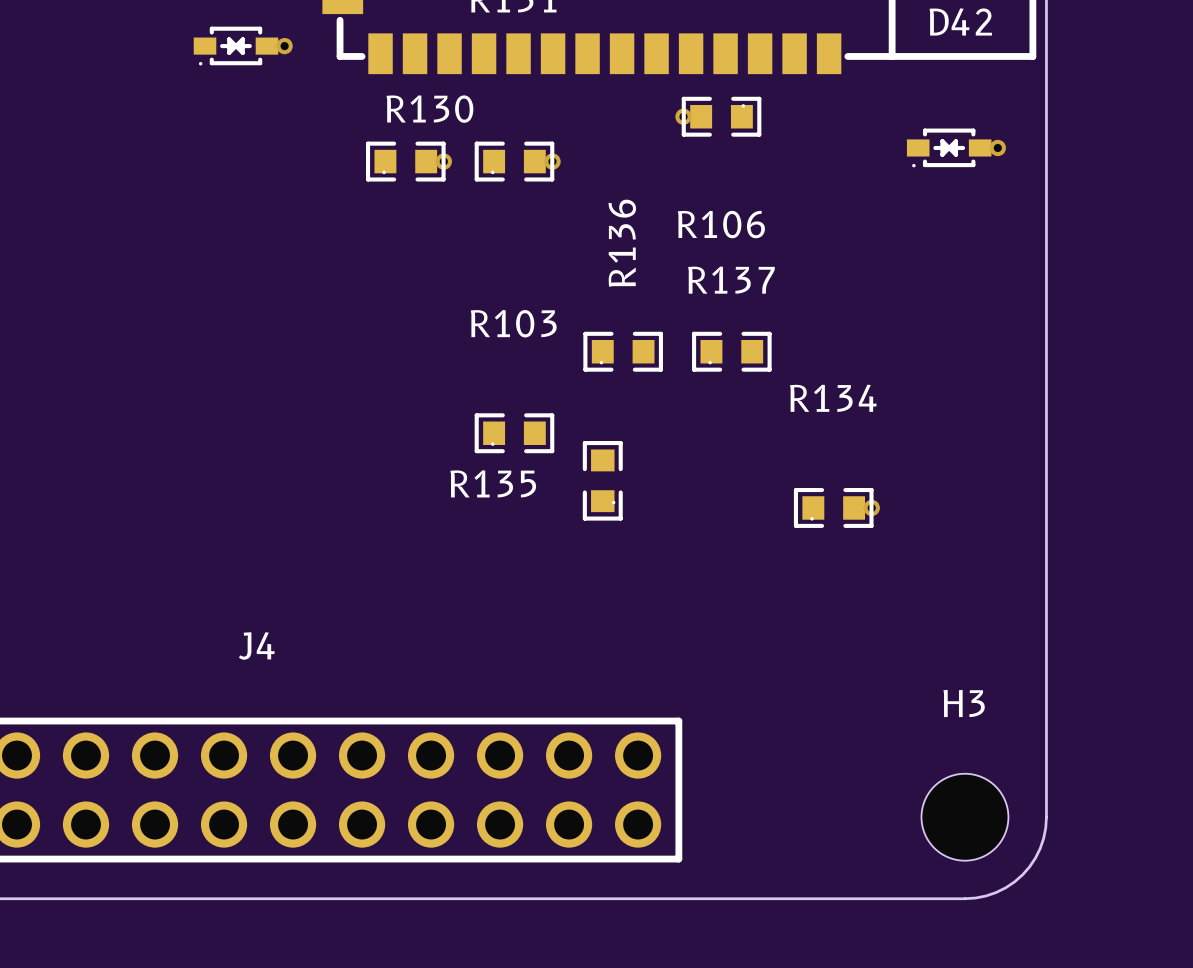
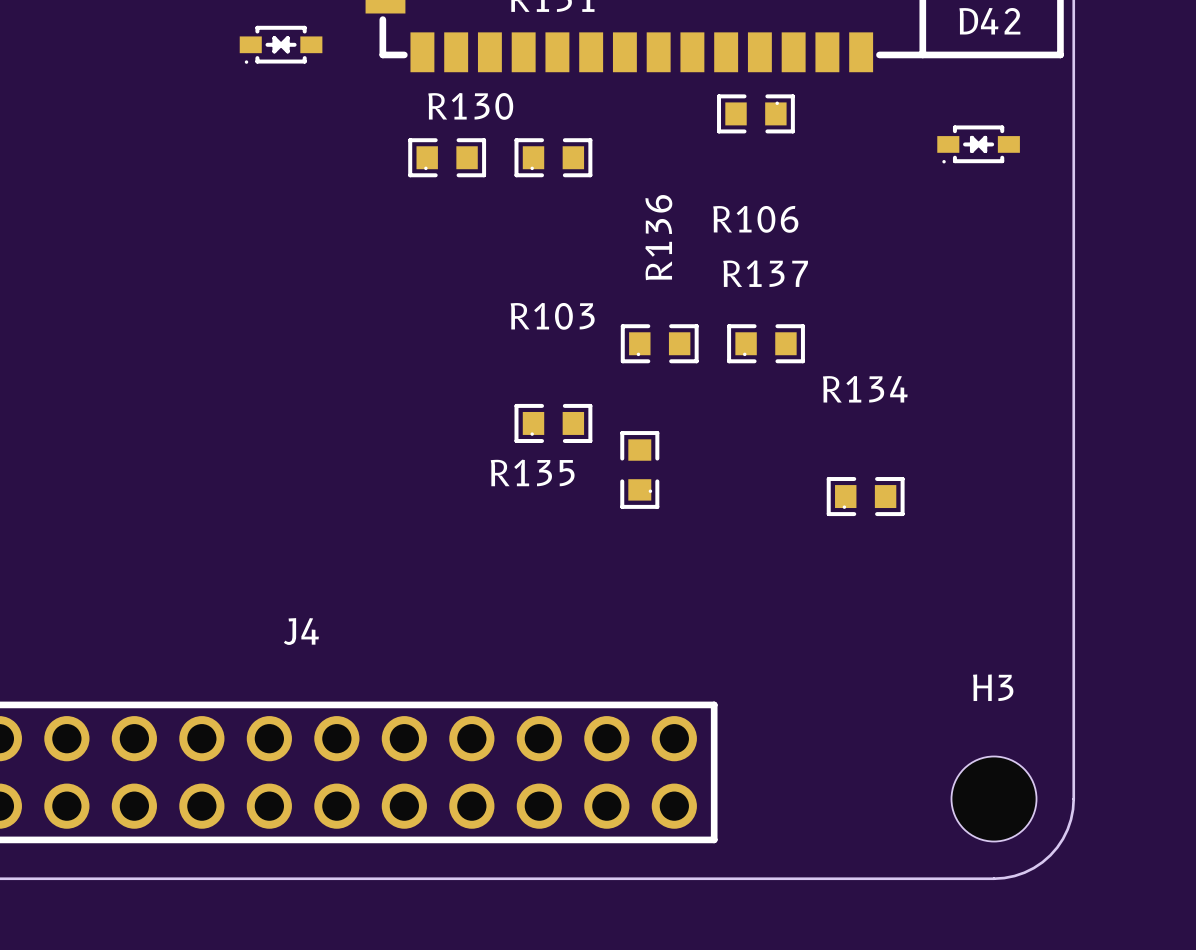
via: (284, 46) -> none
via: (683, 116) -> none
via: (997, 147) -> none
via: (443, 161) -> none
via: (552, 161) -> none
via: (871, 507) -> none

